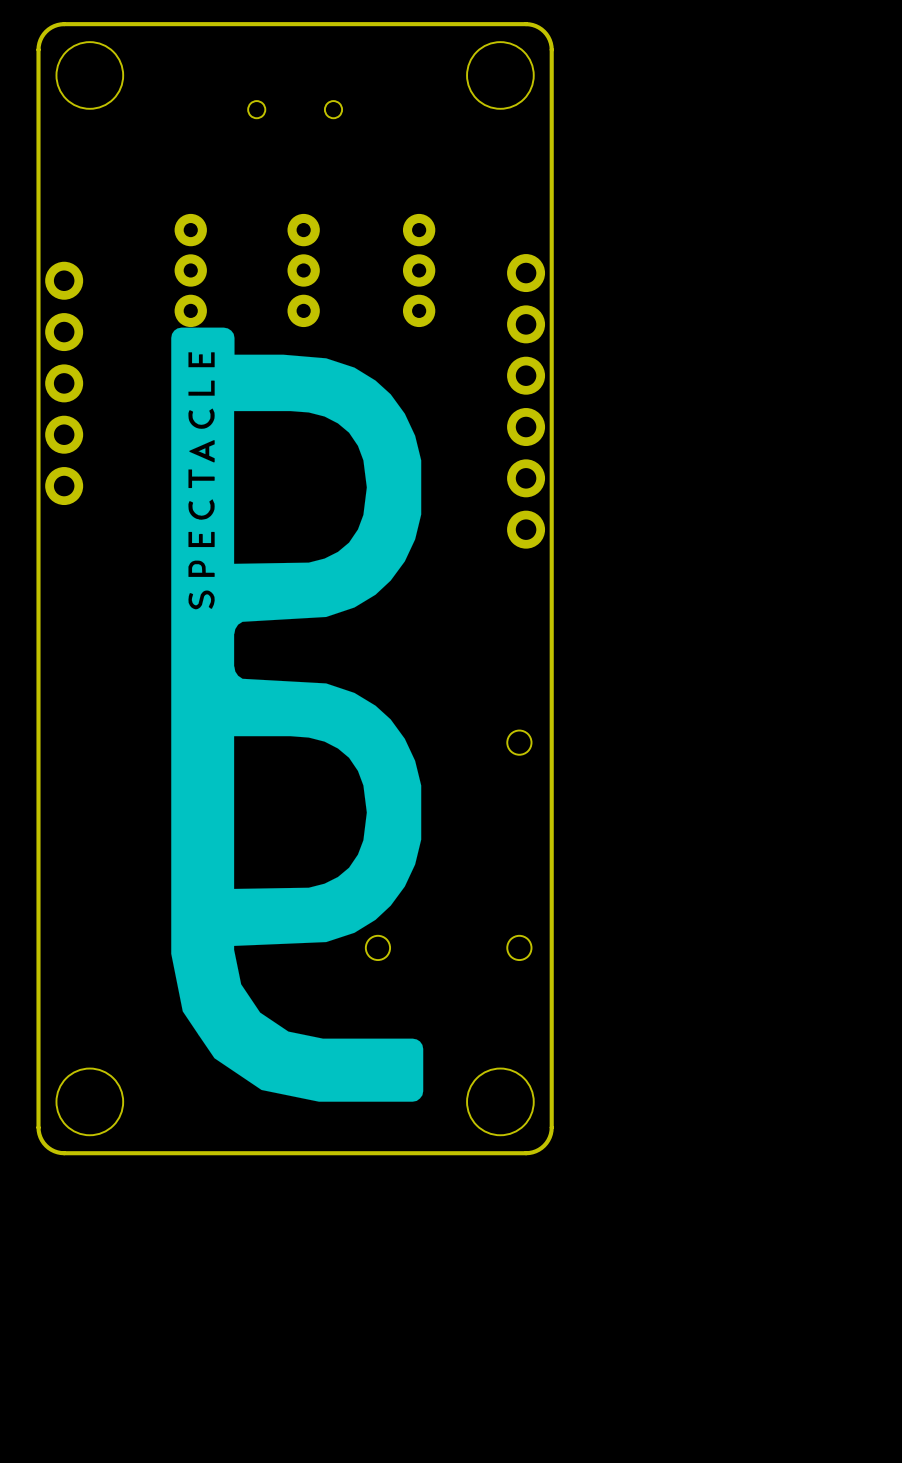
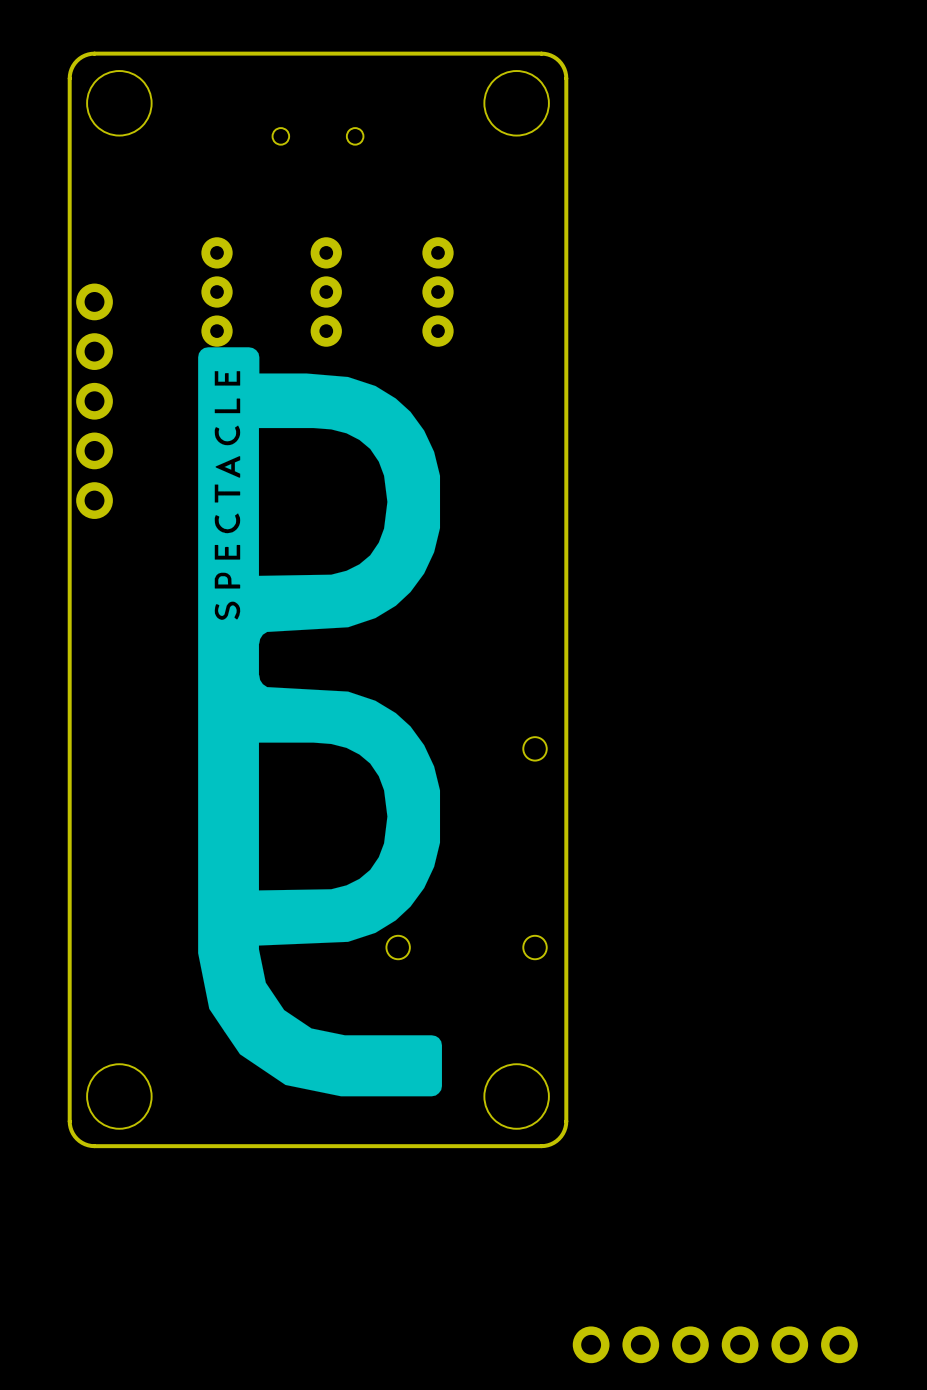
part: (526, 401) -> none
part: none -> (715, 1344)

